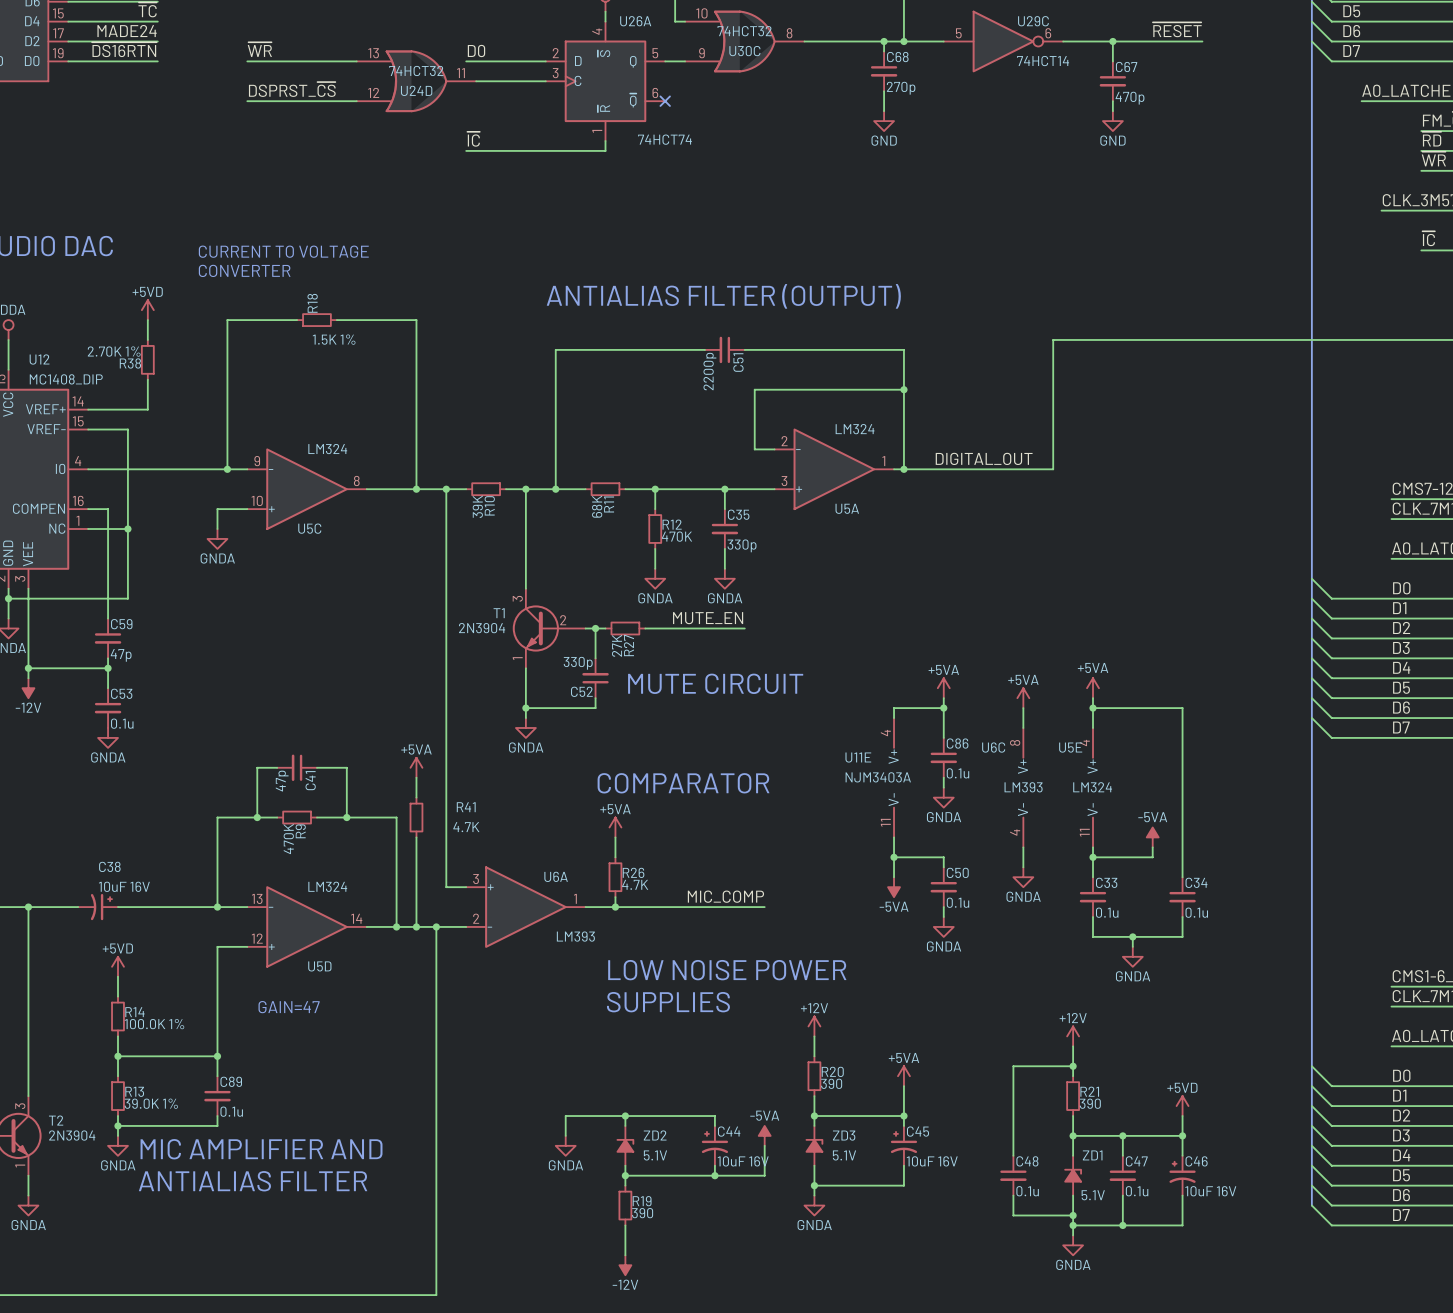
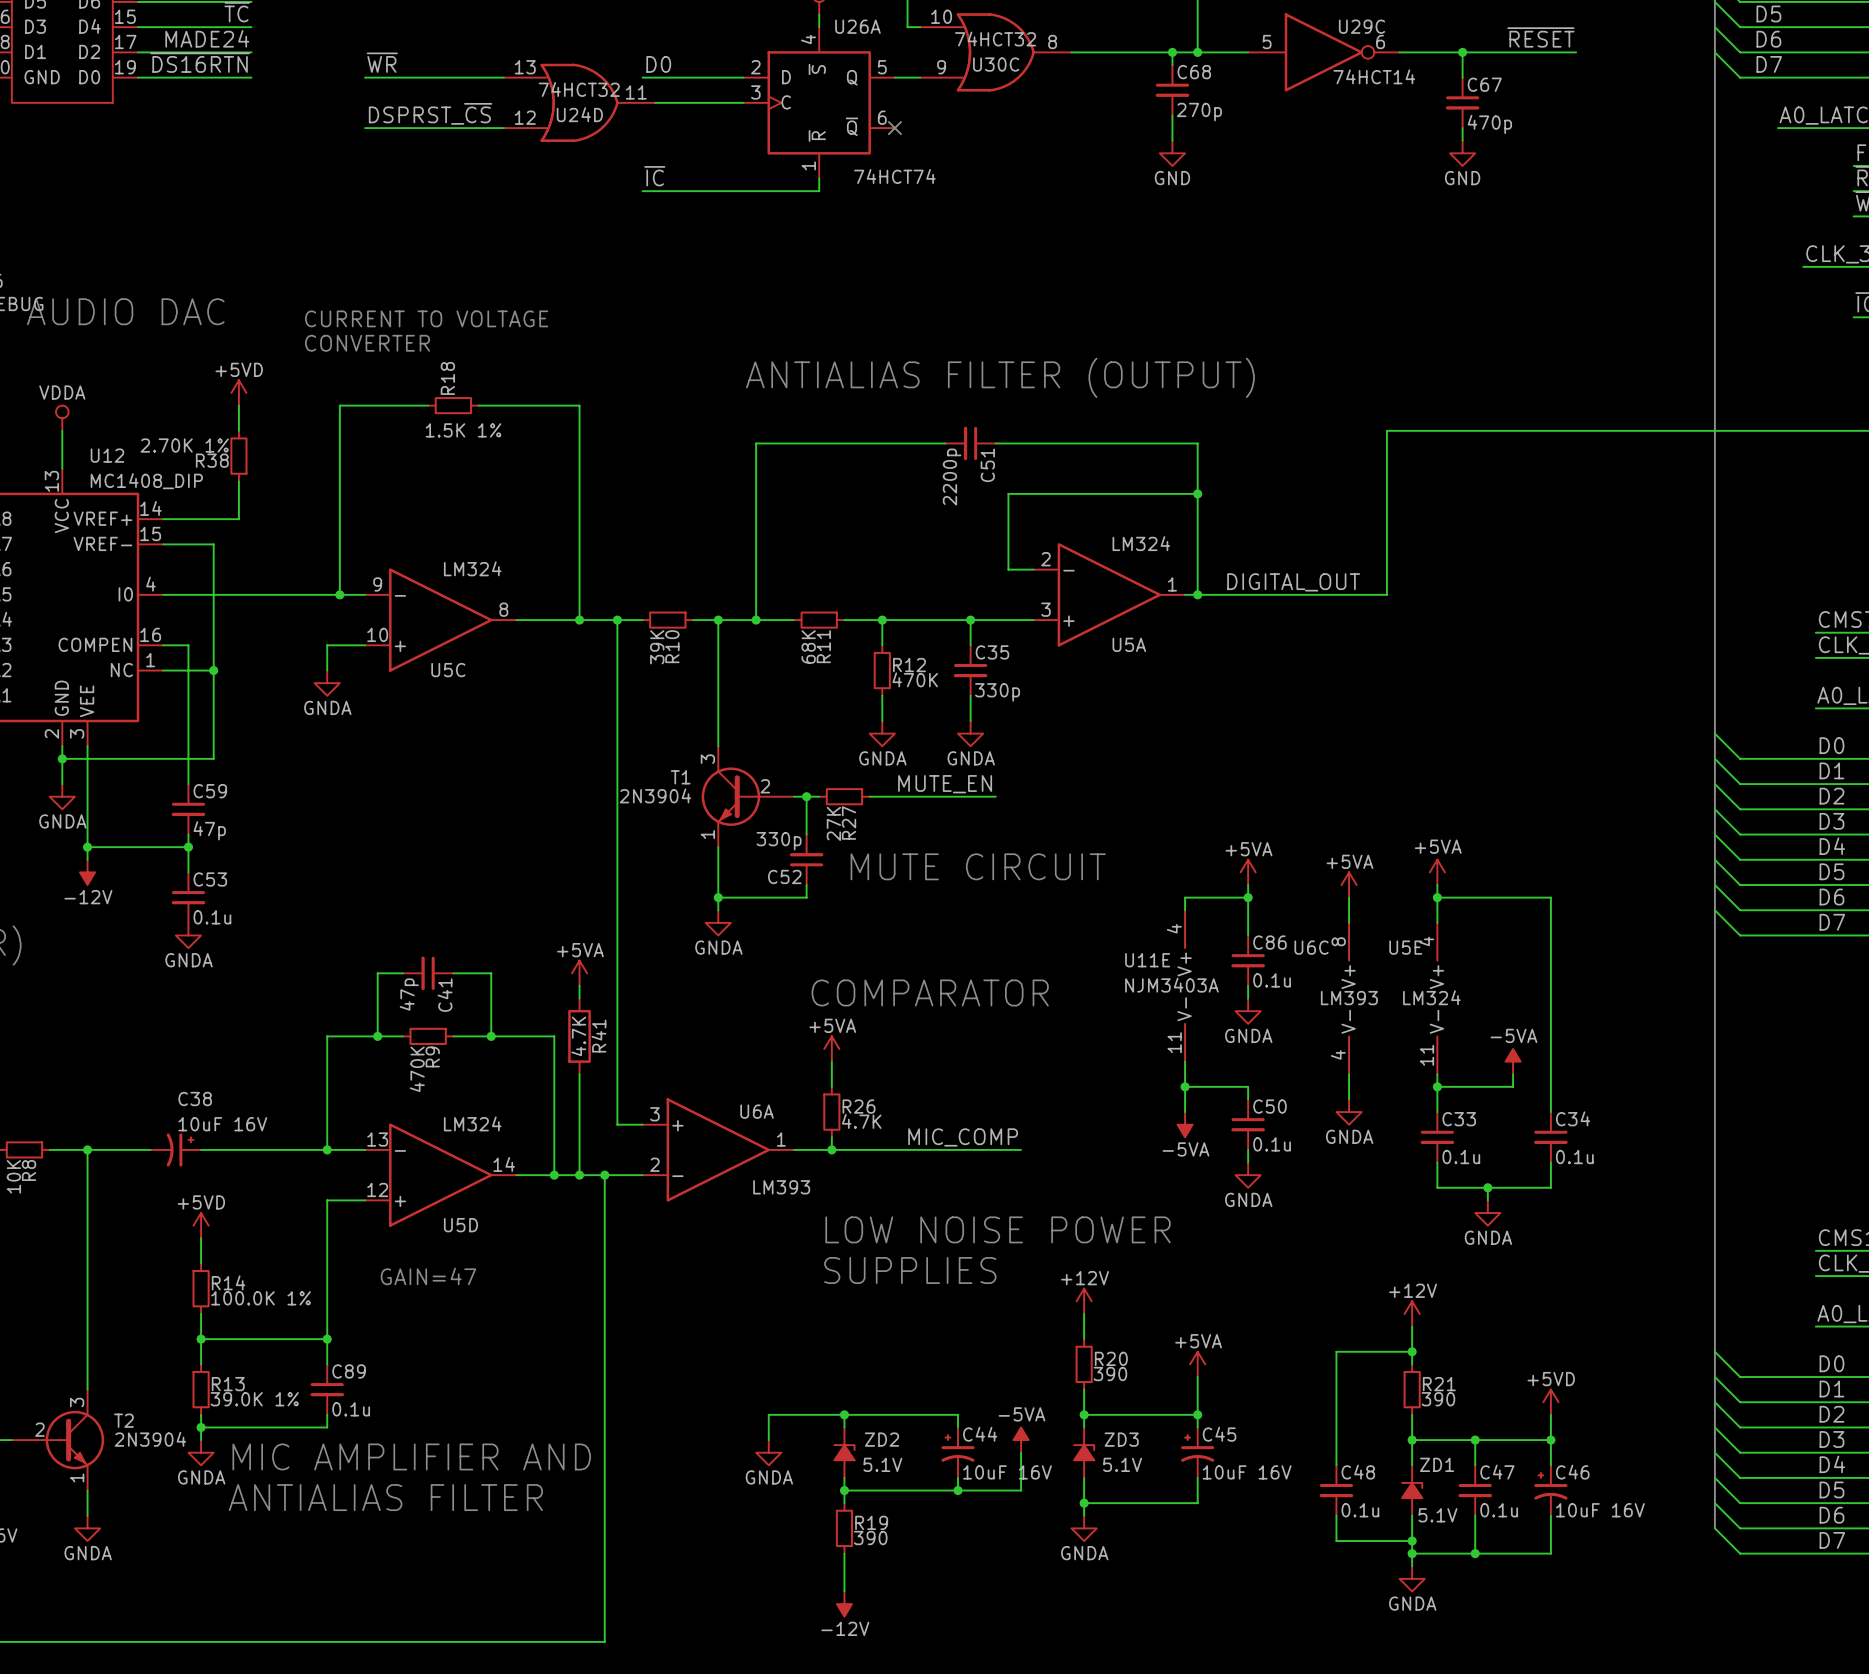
R41 symbol: [409, 797, 424, 838] -> [568, 998, 591, 1075]
R41 name position: R41 (466, 807) -> R41 (598, 1036)
R41 value position: 4.7K (466, 827) -> 4.7K (578, 1036)

